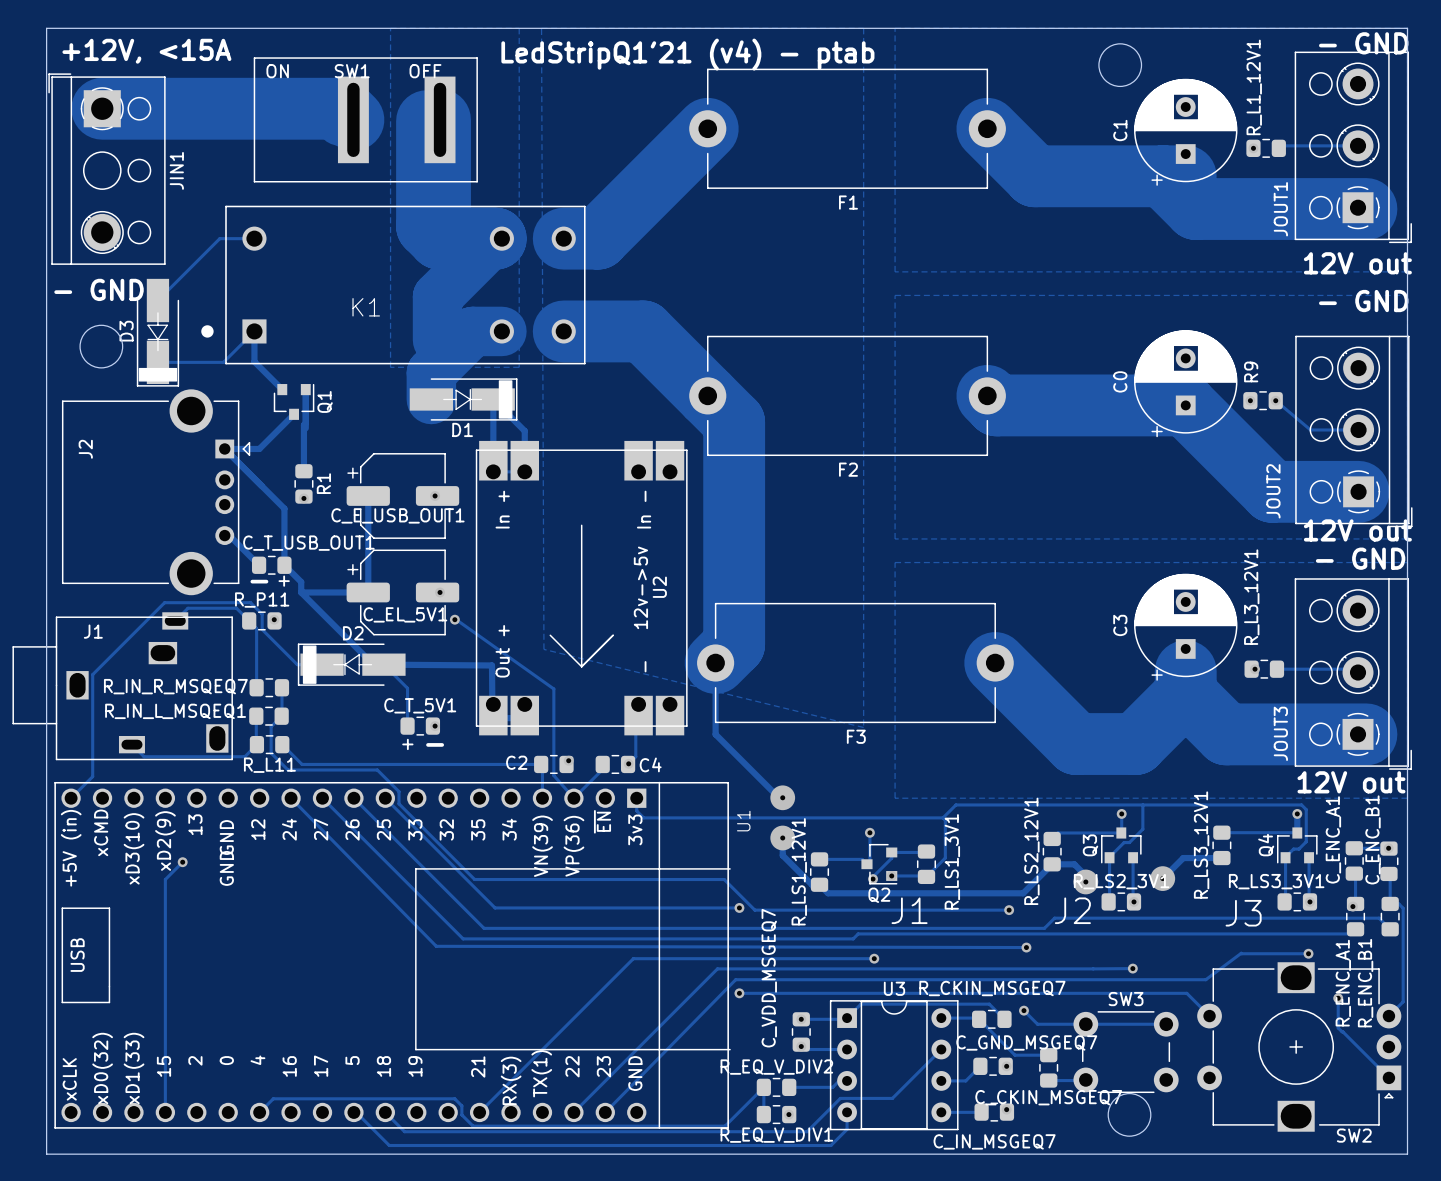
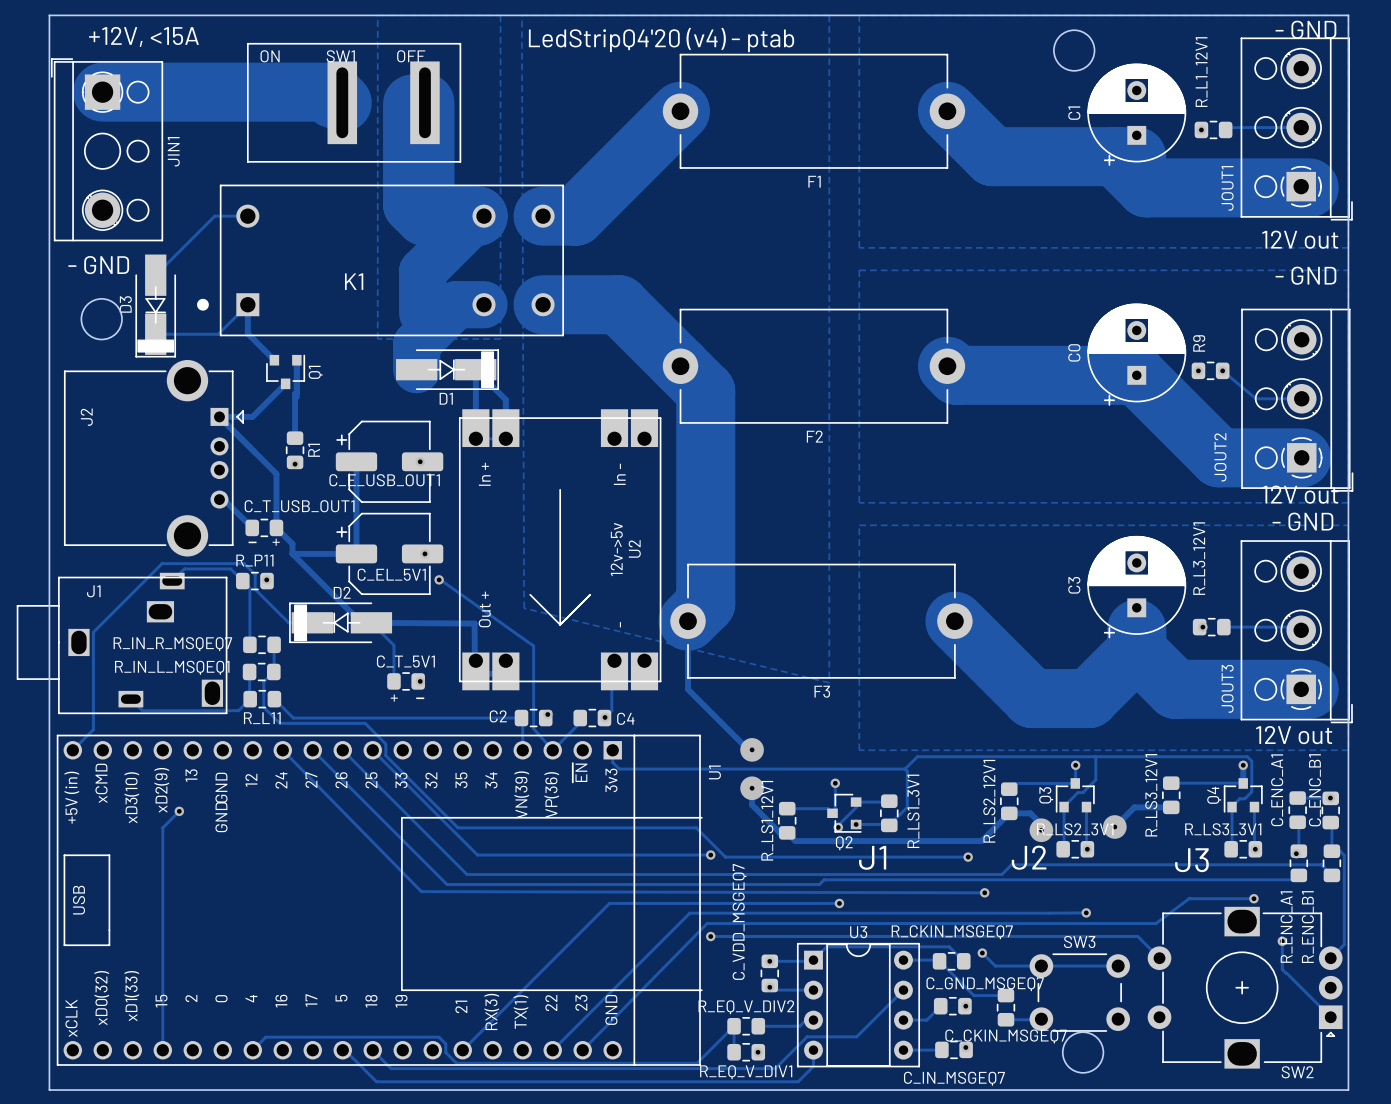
text: LedStripQ1'21 (v4) - ptab (687, 54) -> LedStripQ4'20 (v4) - ptab (661, 40)

